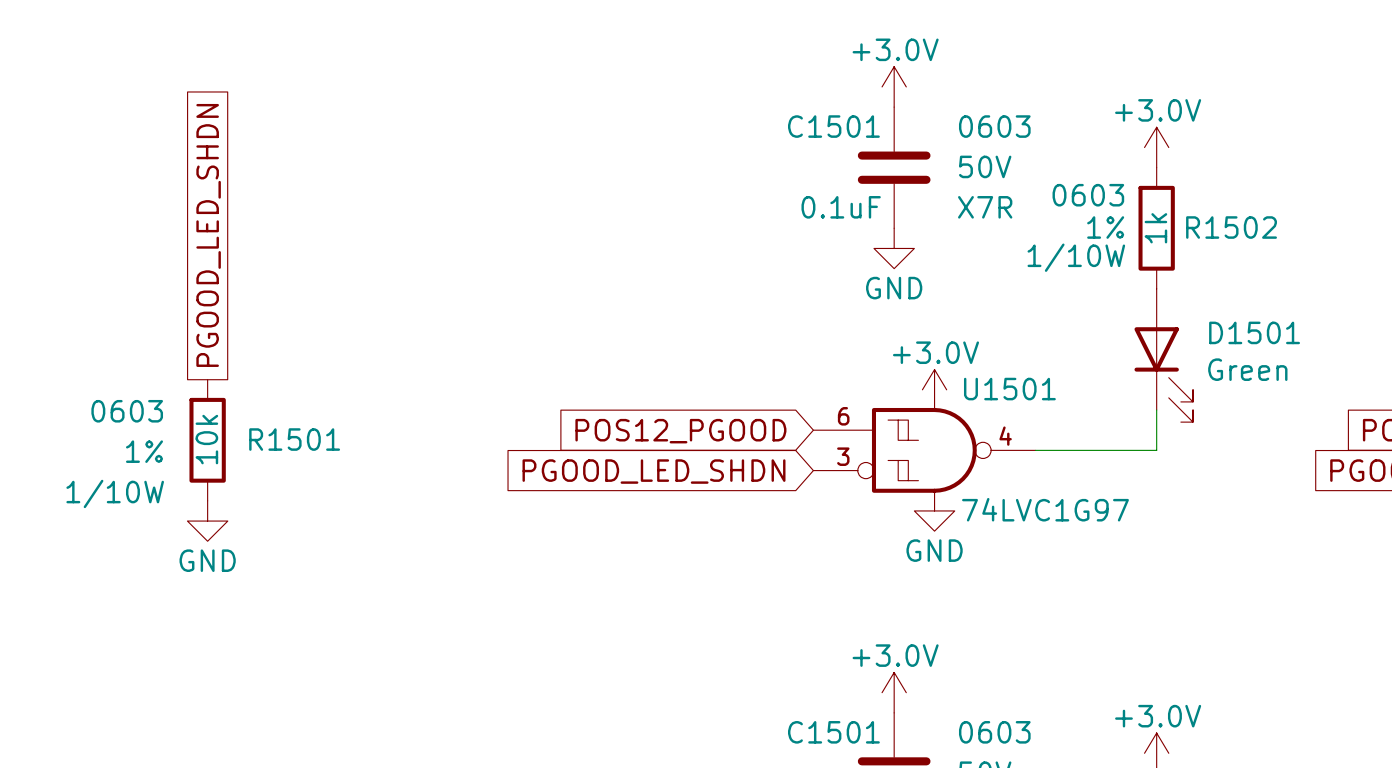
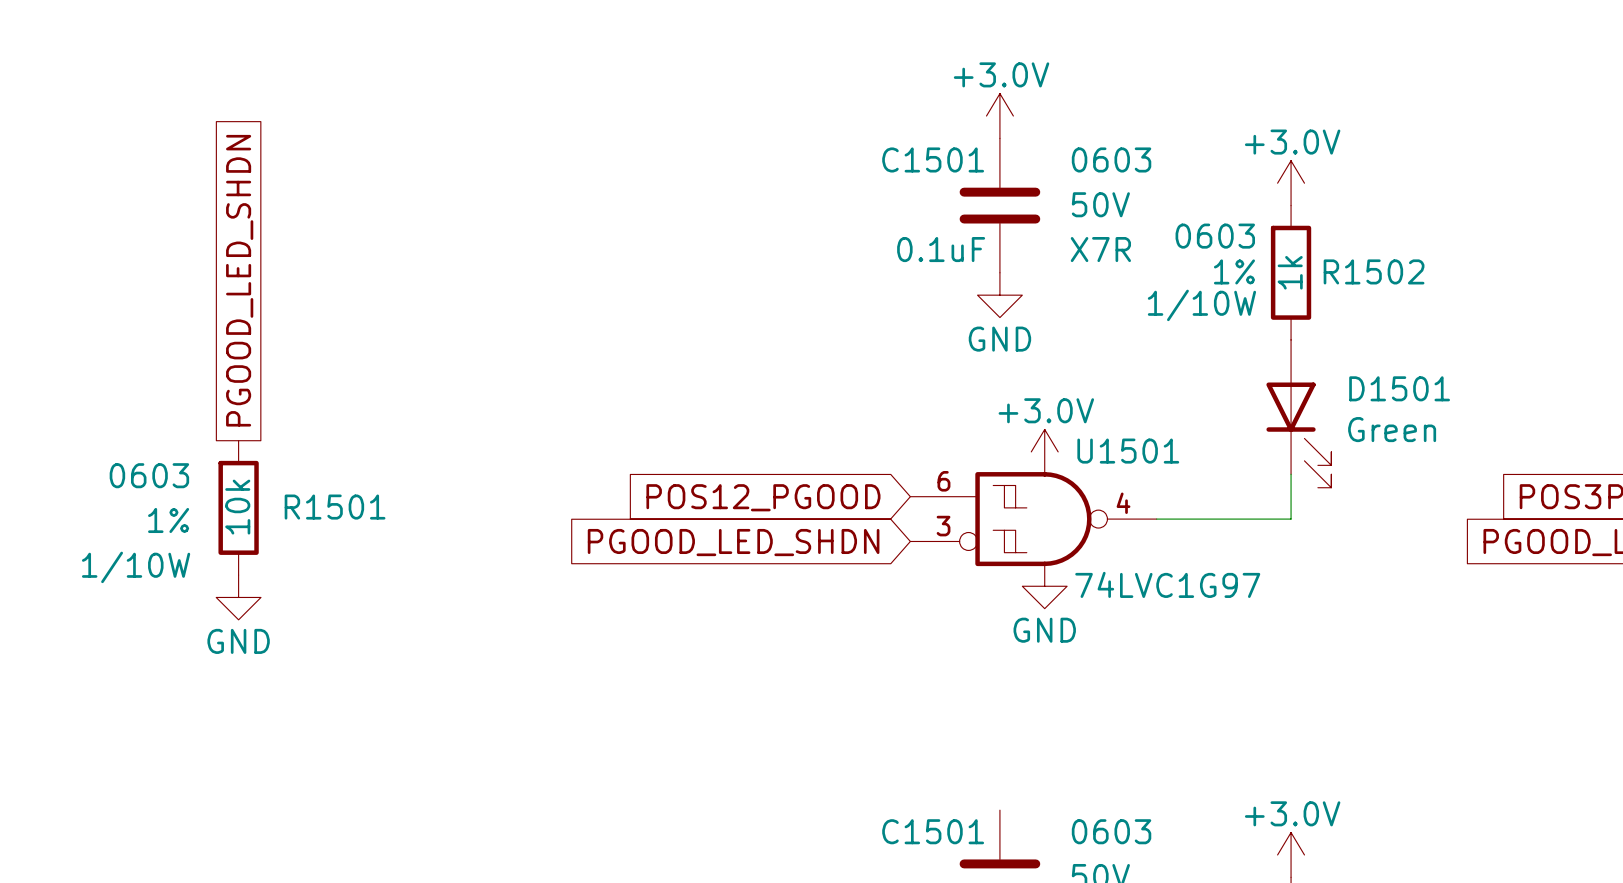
power symbol: +3.0V (894, 692) -> none

